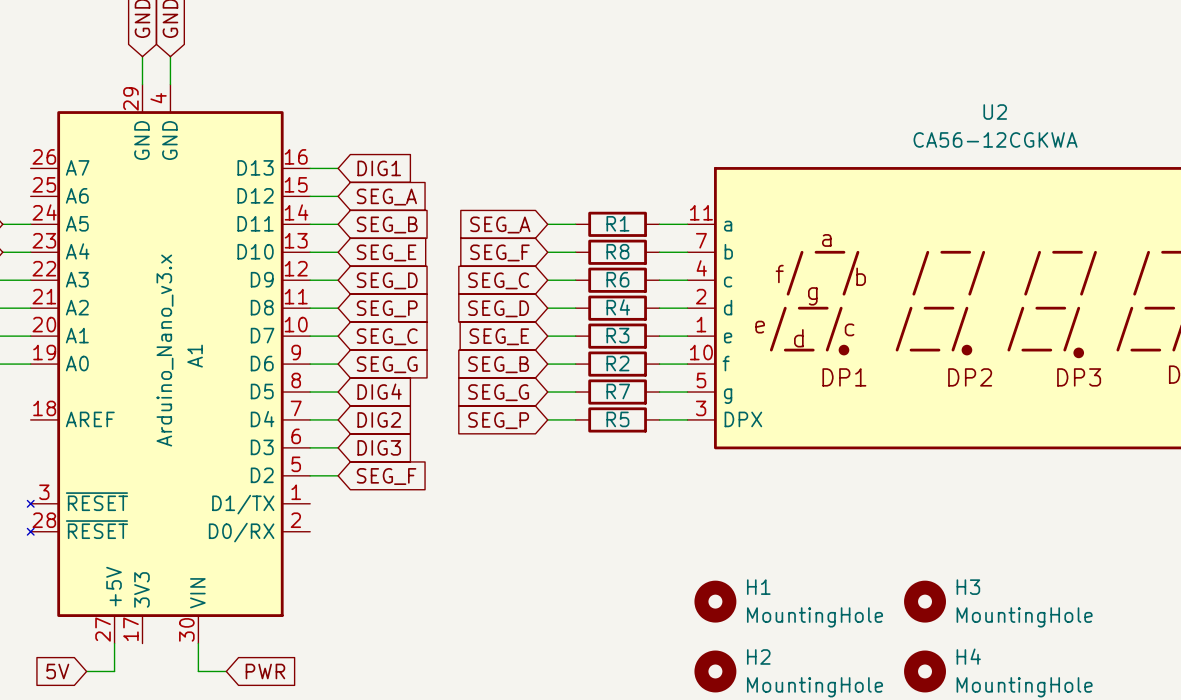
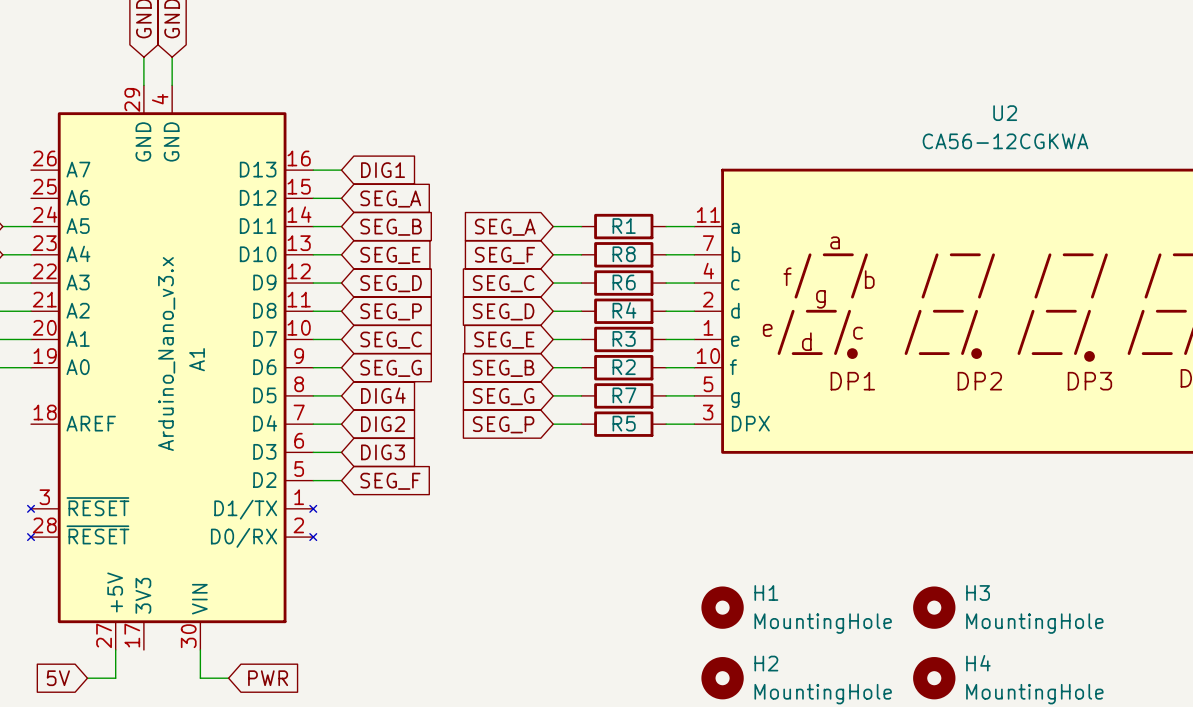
A1 symbol: [27, 84, 311, 644] -> [27, 85, 317, 650]

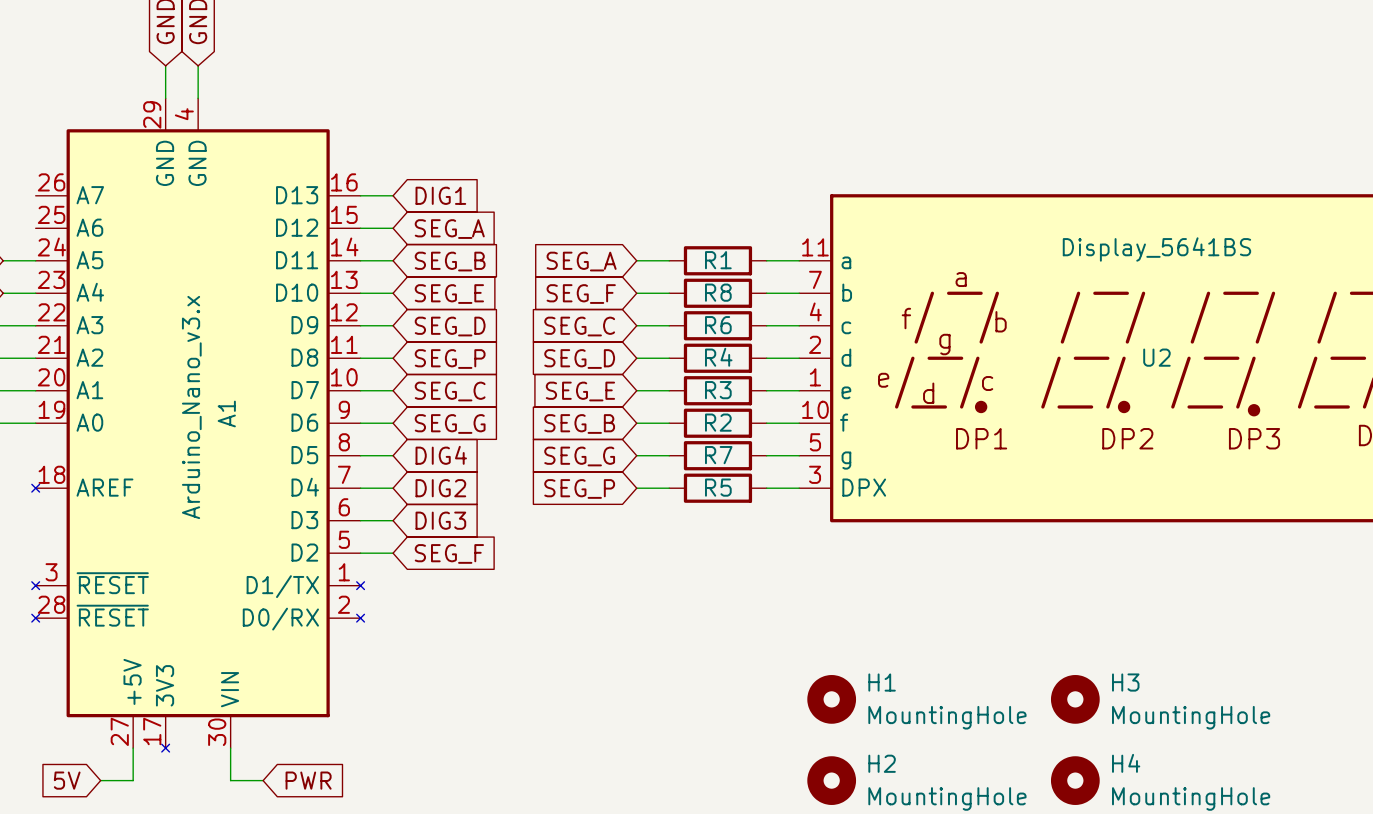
A1 symbol: [27, 85, 317, 650] -> [31, 98, 365, 752]
U2 name position: U2 (1005, 113) -> U2 (1156, 357)
U2 value: CA56-12CGKWA (1005, 141) -> Display_5641BS (1156, 249)

